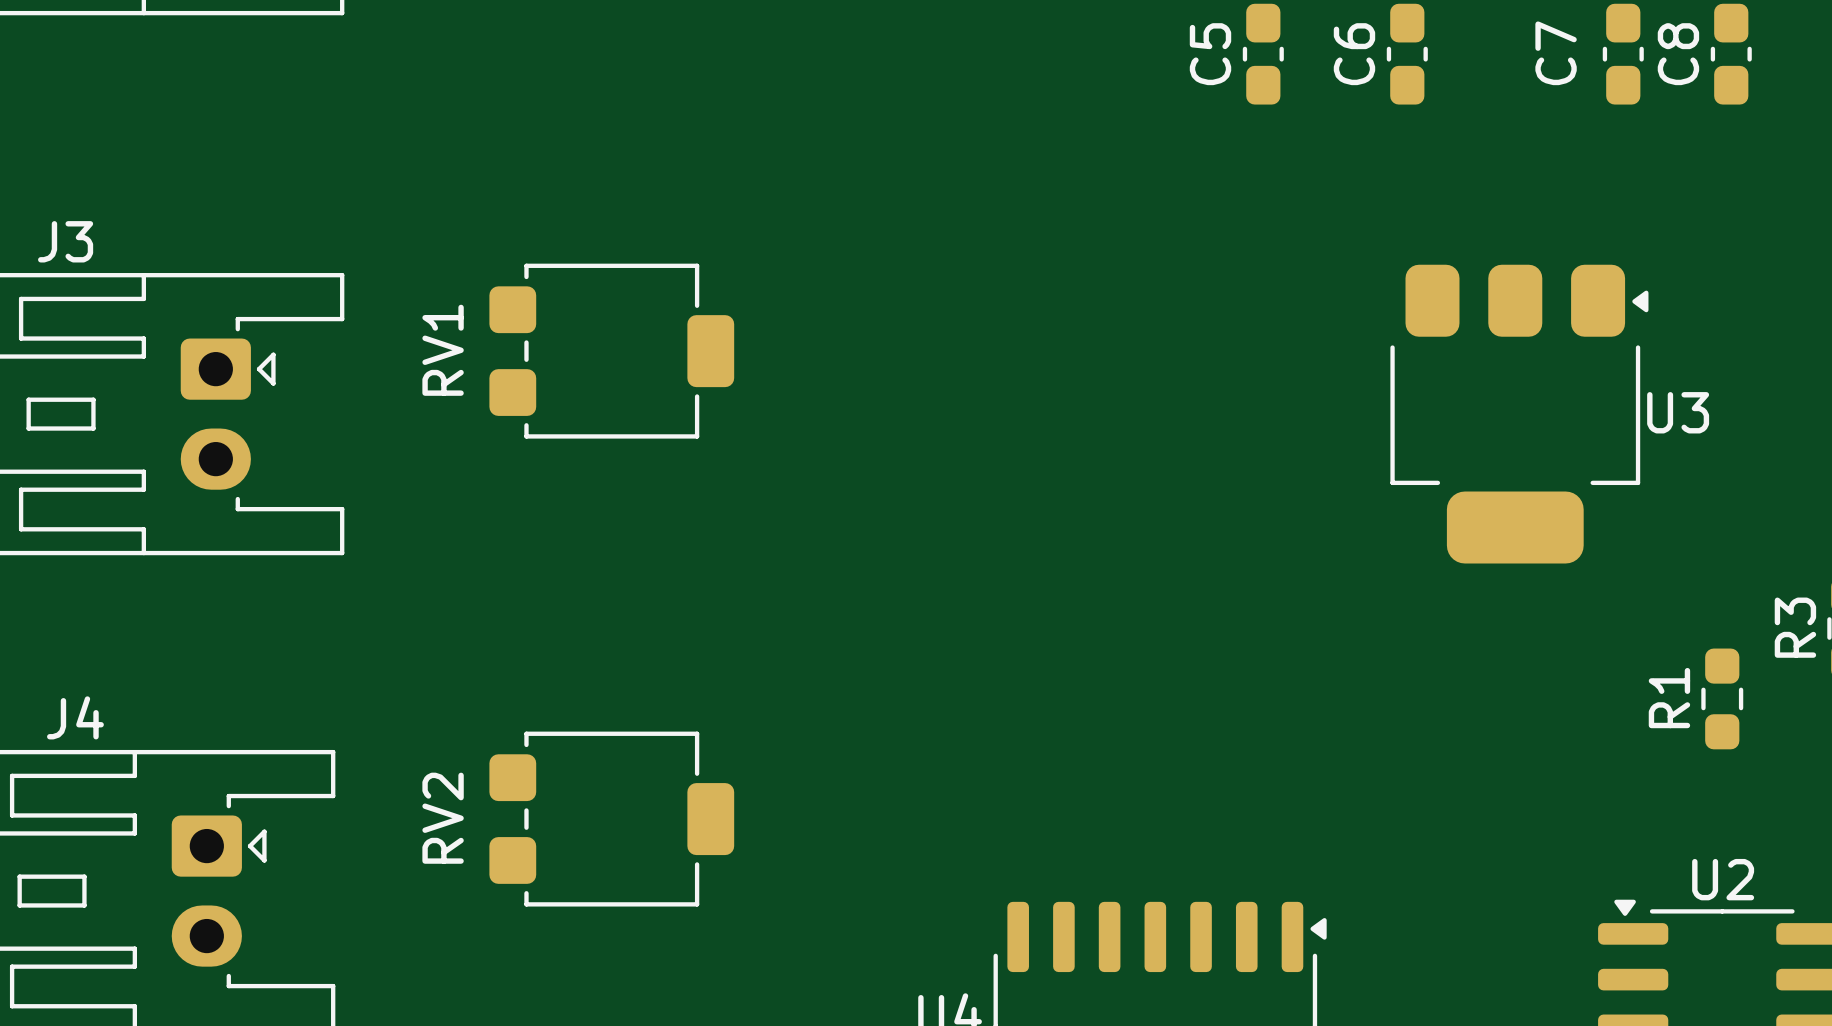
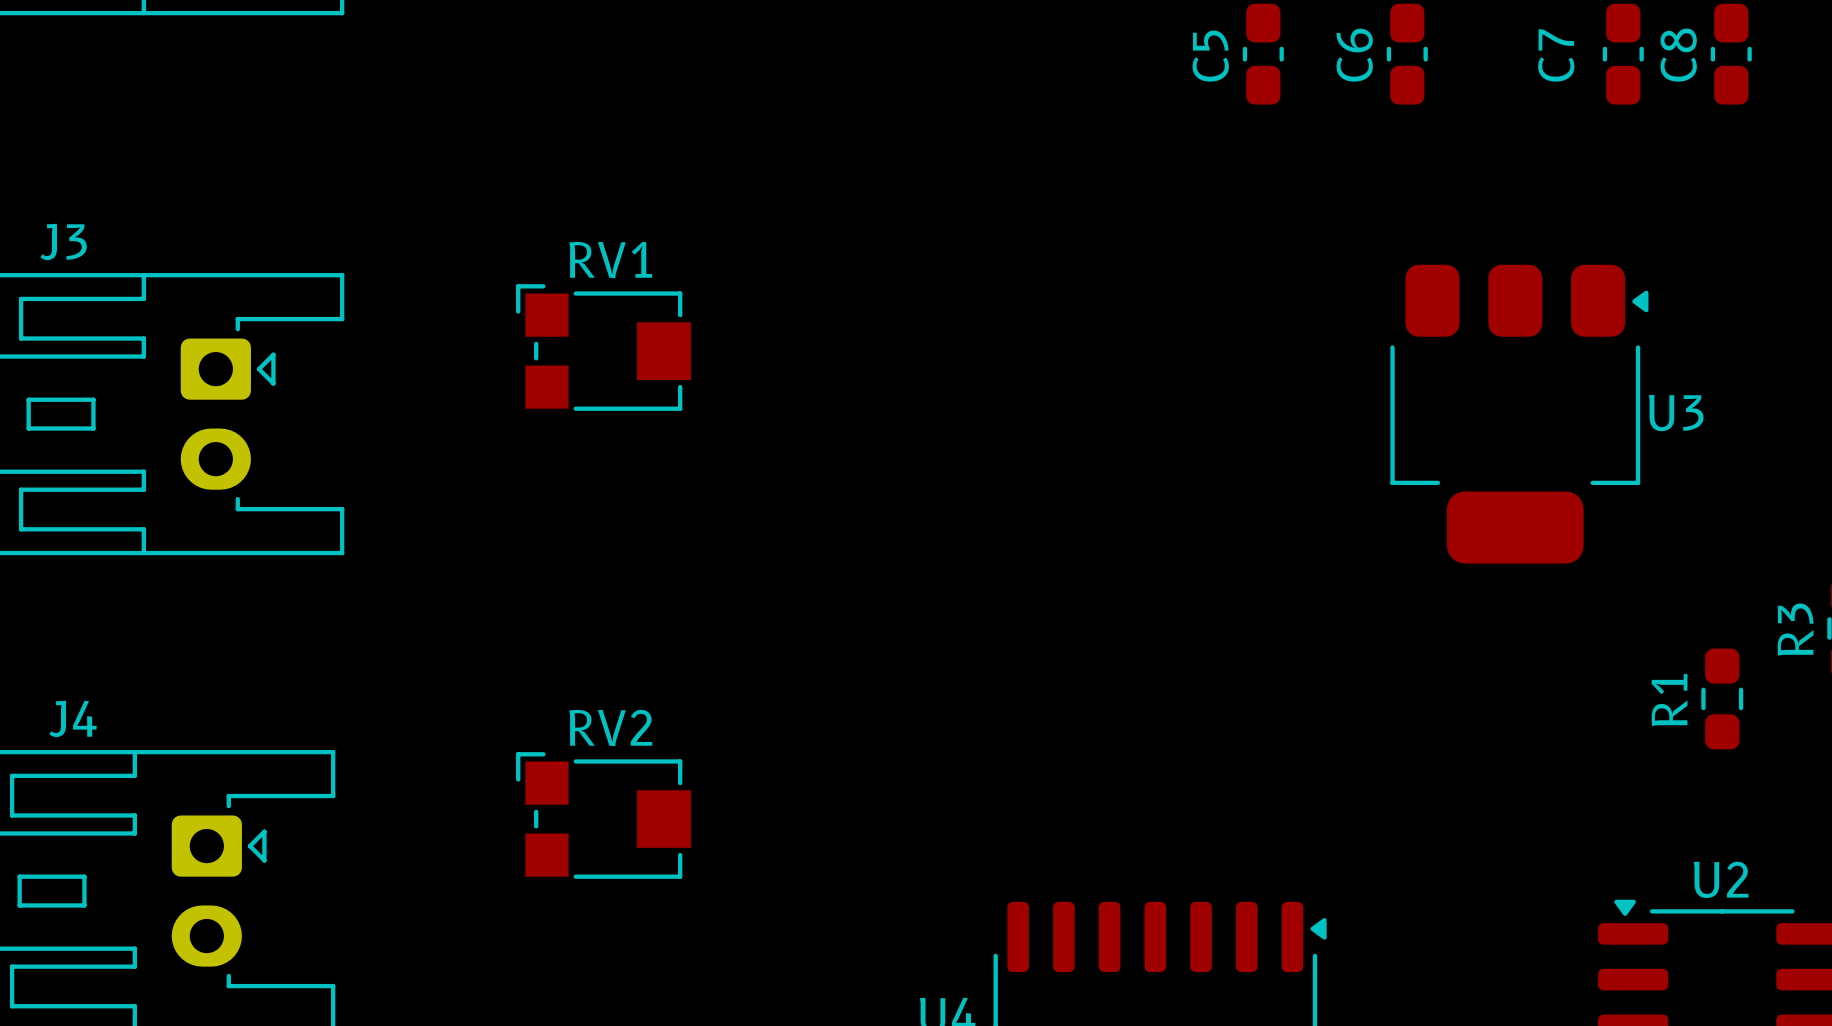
RV1 footprint: [489, 263, 735, 439] -> [516, 284, 691, 411]
RV1 name position: RV1 (443, 350) -> RV1 (610, 260)
RV2 footprint: [489, 731, 735, 907] -> [516, 752, 691, 879]
RV2 name position: RV2 (443, 818) -> RV2 (610, 727)

